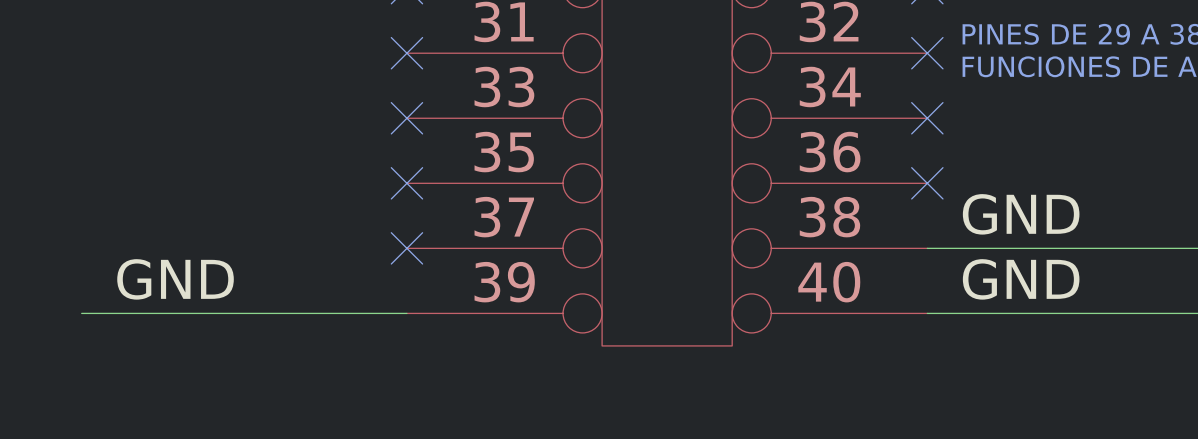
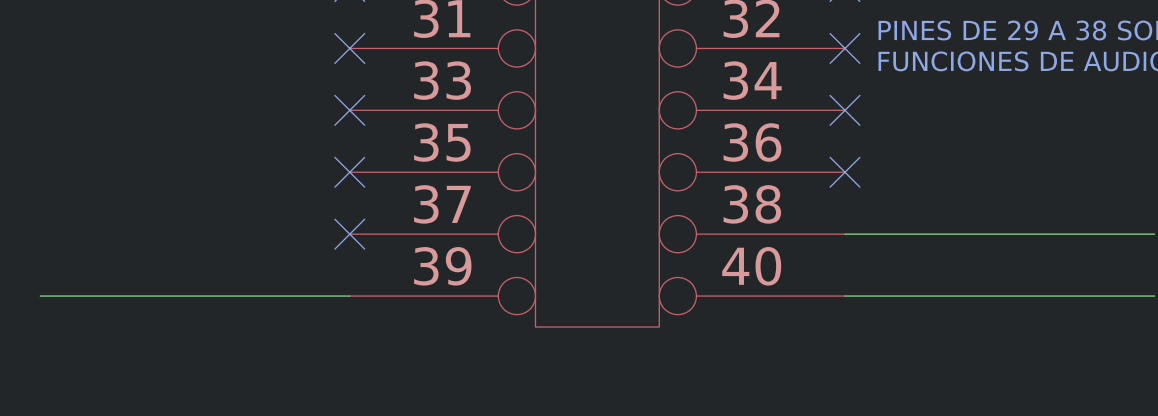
label: GND (1021, 214) -> none
label: GND (175, 279) -> none
label: GND (1021, 279) -> none

